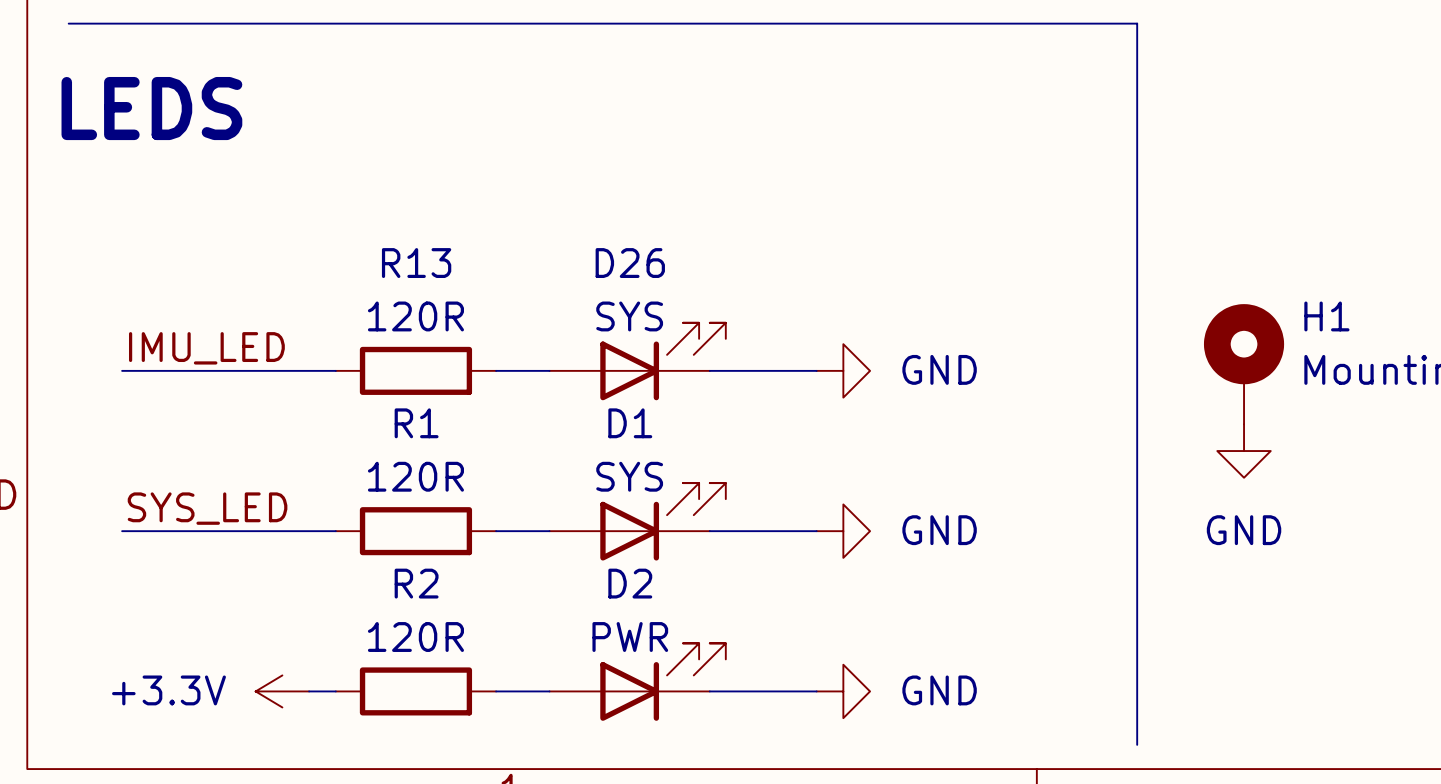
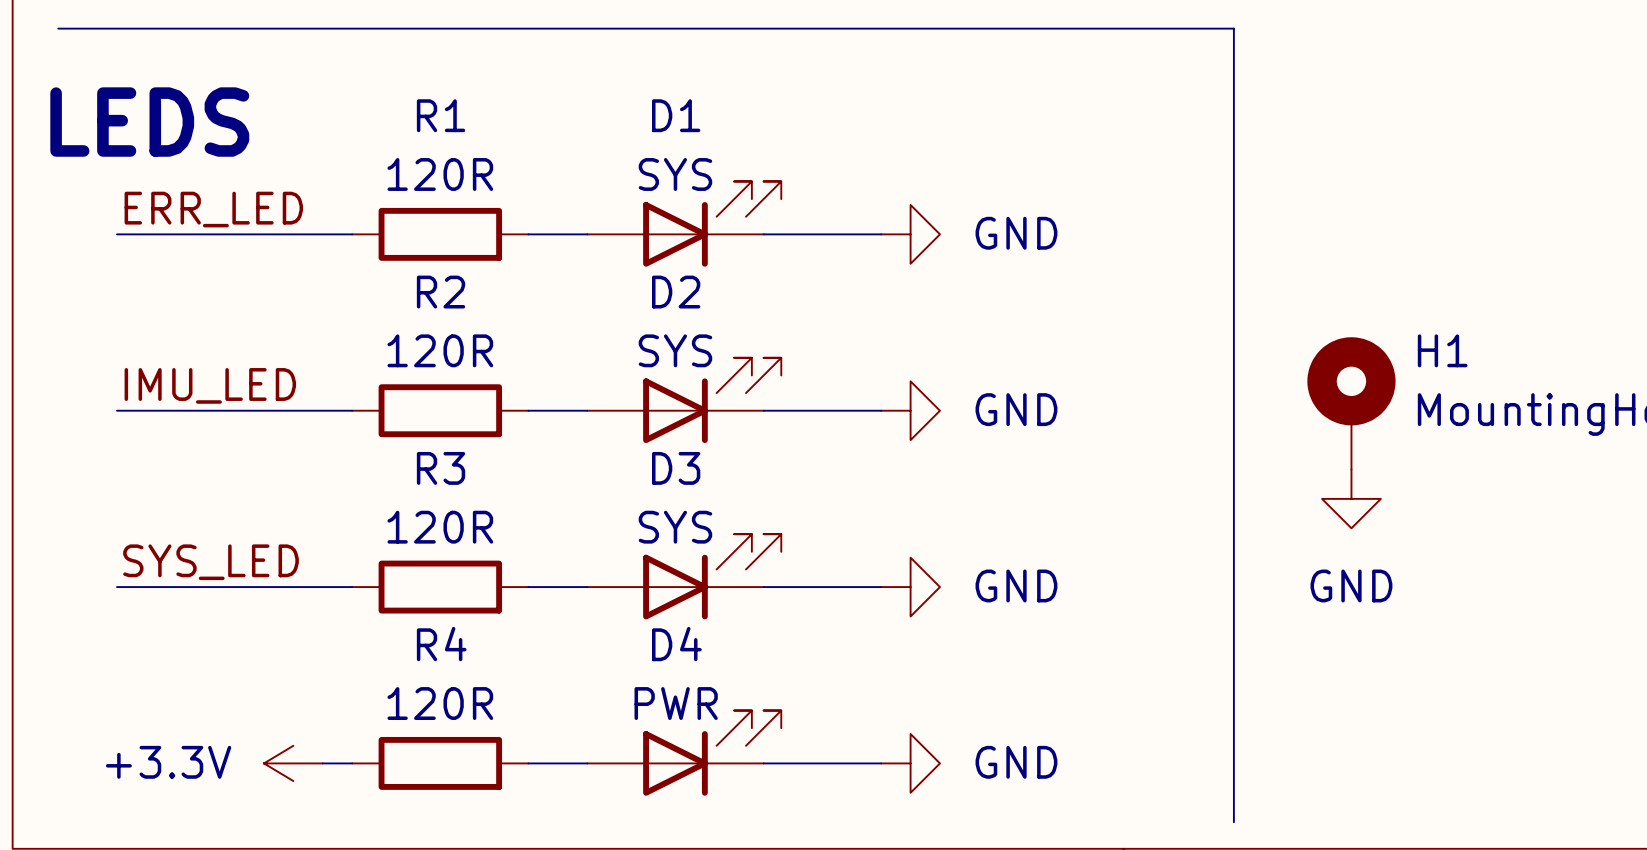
label: none -> ERR_LED (213, 209)
D1: none -> SYS (684, 224)
wire: none -> (117, 234) (352, 234)
R1: none -> 120R (440, 234)
wire: none -> (528, 234) (587, 234)
wire: none -> (763, 234) (881, 234)
power symbol: none -> GND (910, 234)
R13 name: R13 (416, 263) -> R2 (441, 292)
D26 name: D26 (630, 263) -> D2 (676, 292)
R1 name: R1 (416, 423) -> R3 (441, 468)
D1 name: D1 (630, 423) -> D3 (676, 468)
R2 name: R2 (416, 583) -> R4 (441, 644)
D2 name: D2 (630, 583) -> D4 (676, 644)

